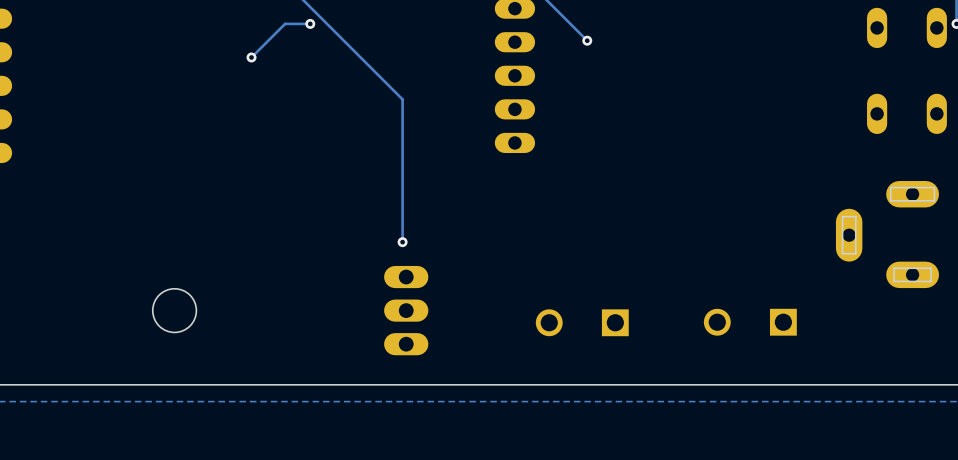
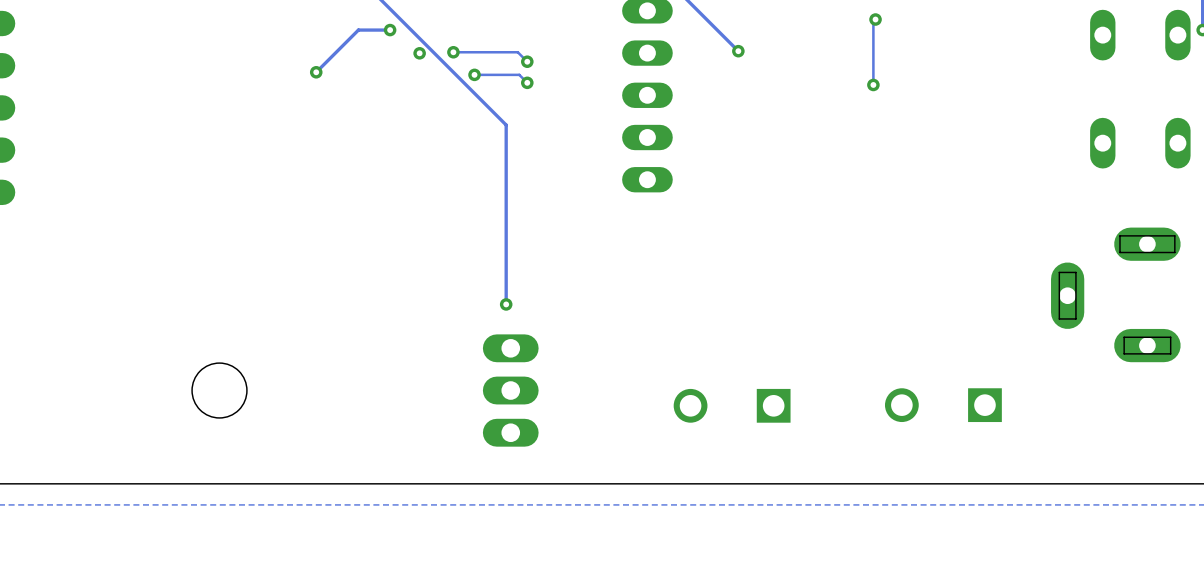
track: none -> (875, 19) (873, 21) (873, 84)
via: none -> (875, 19)
track: none -> (453, 52) (517, 52) (527, 61)
via: none -> (453, 52)
via: none -> (419, 53)
via: none -> (527, 61)
track: none -> (474, 74) (519, 74) (527, 82)
via: none -> (474, 74)
via: none -> (527, 82)
via: none -> (873, 84)

